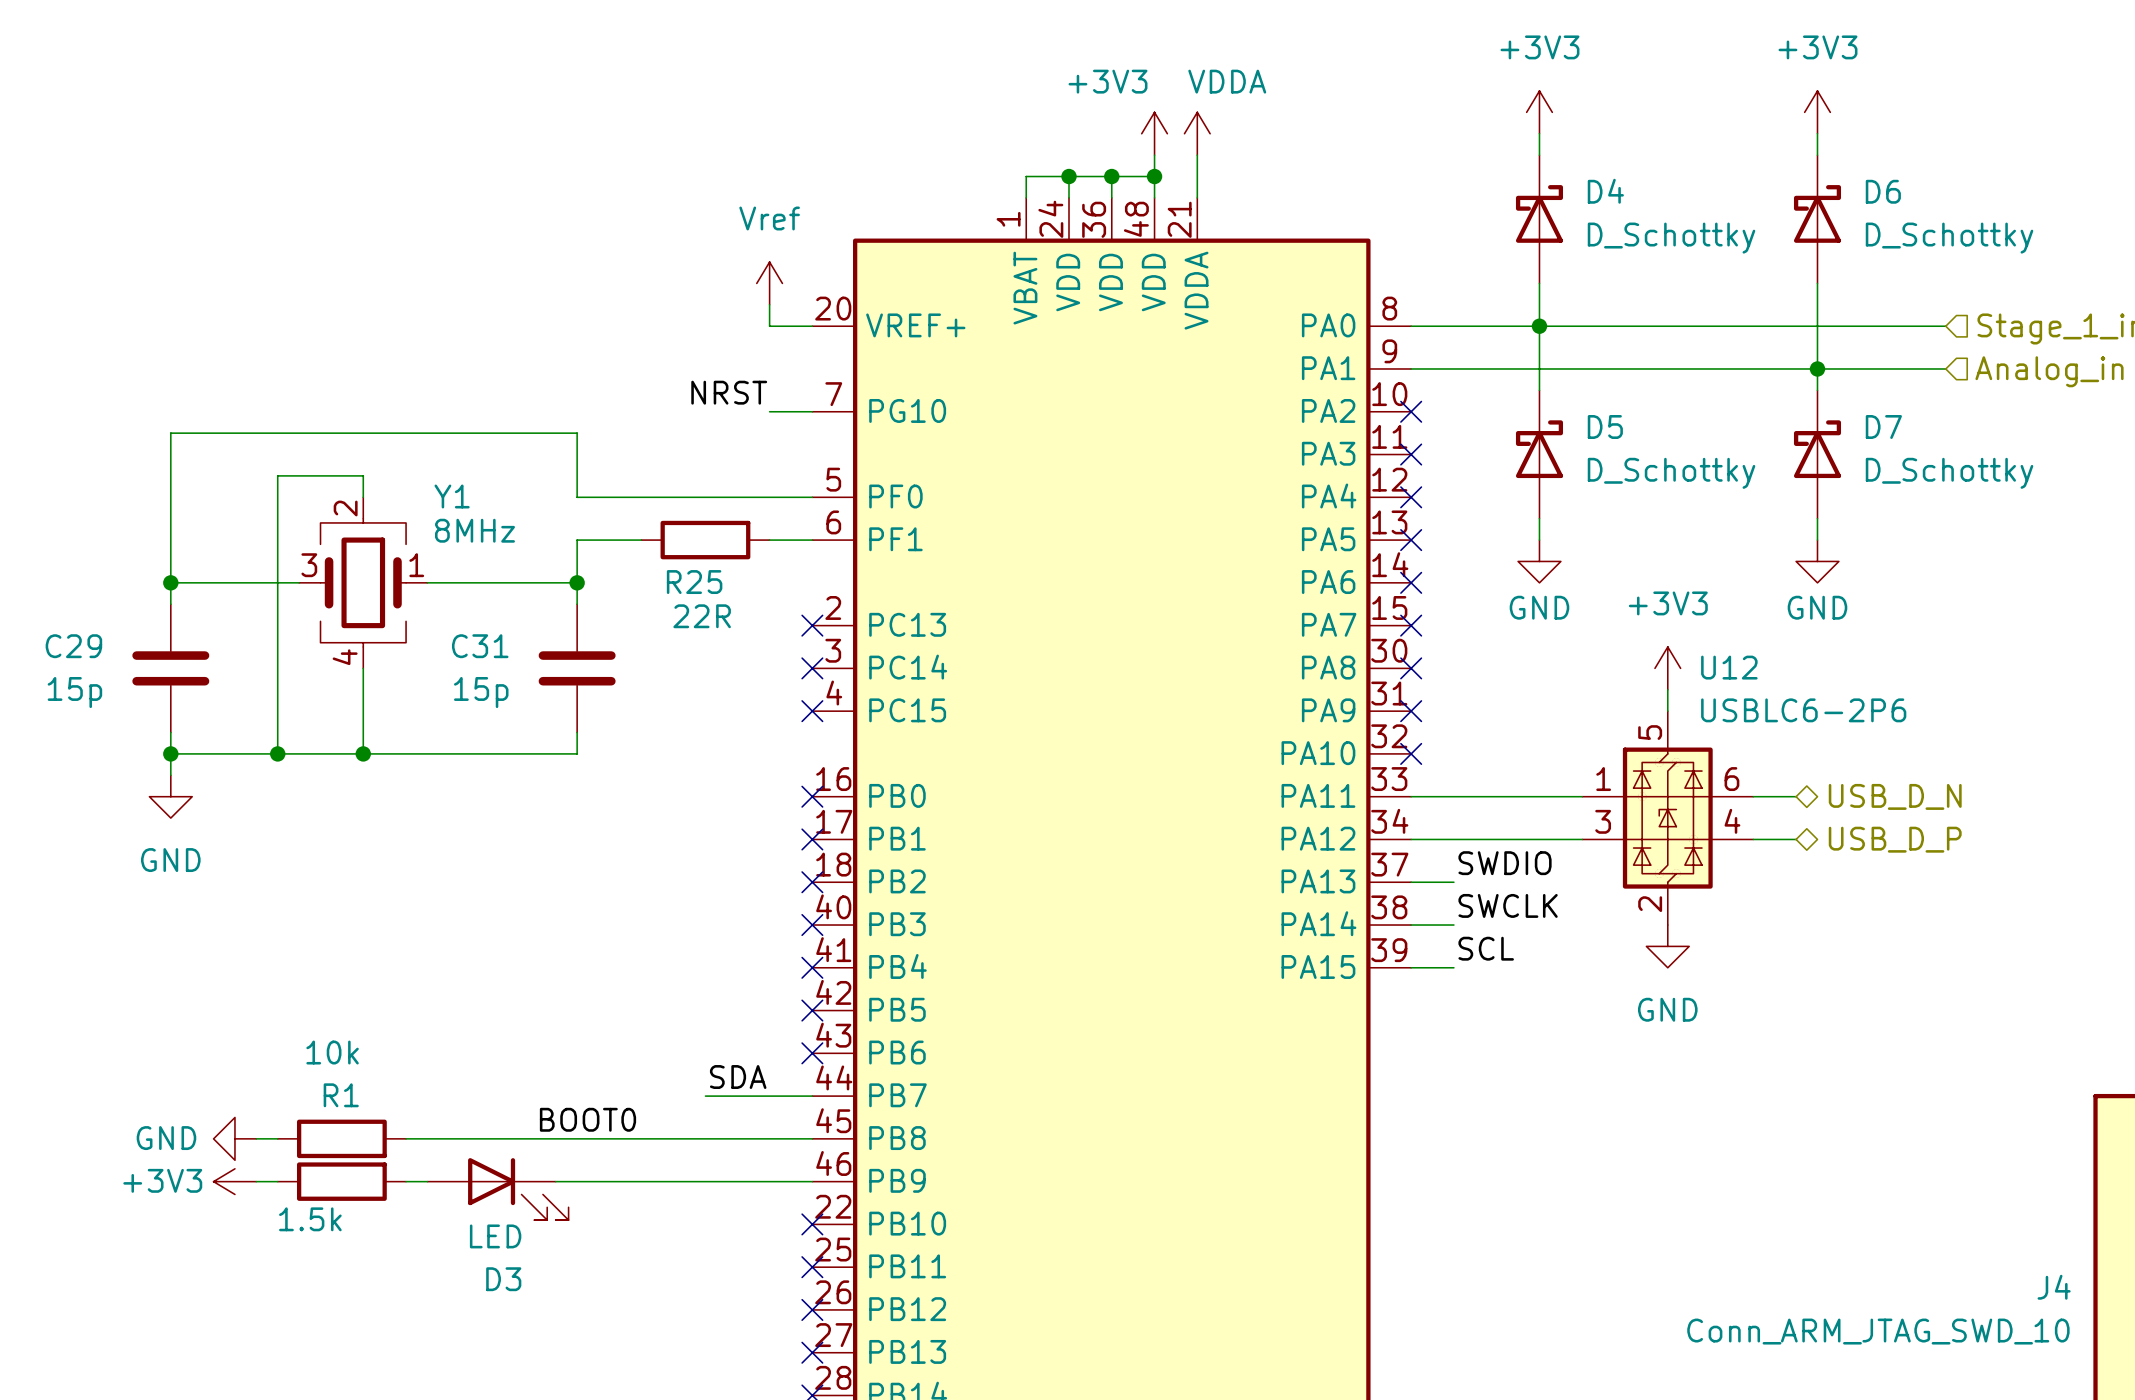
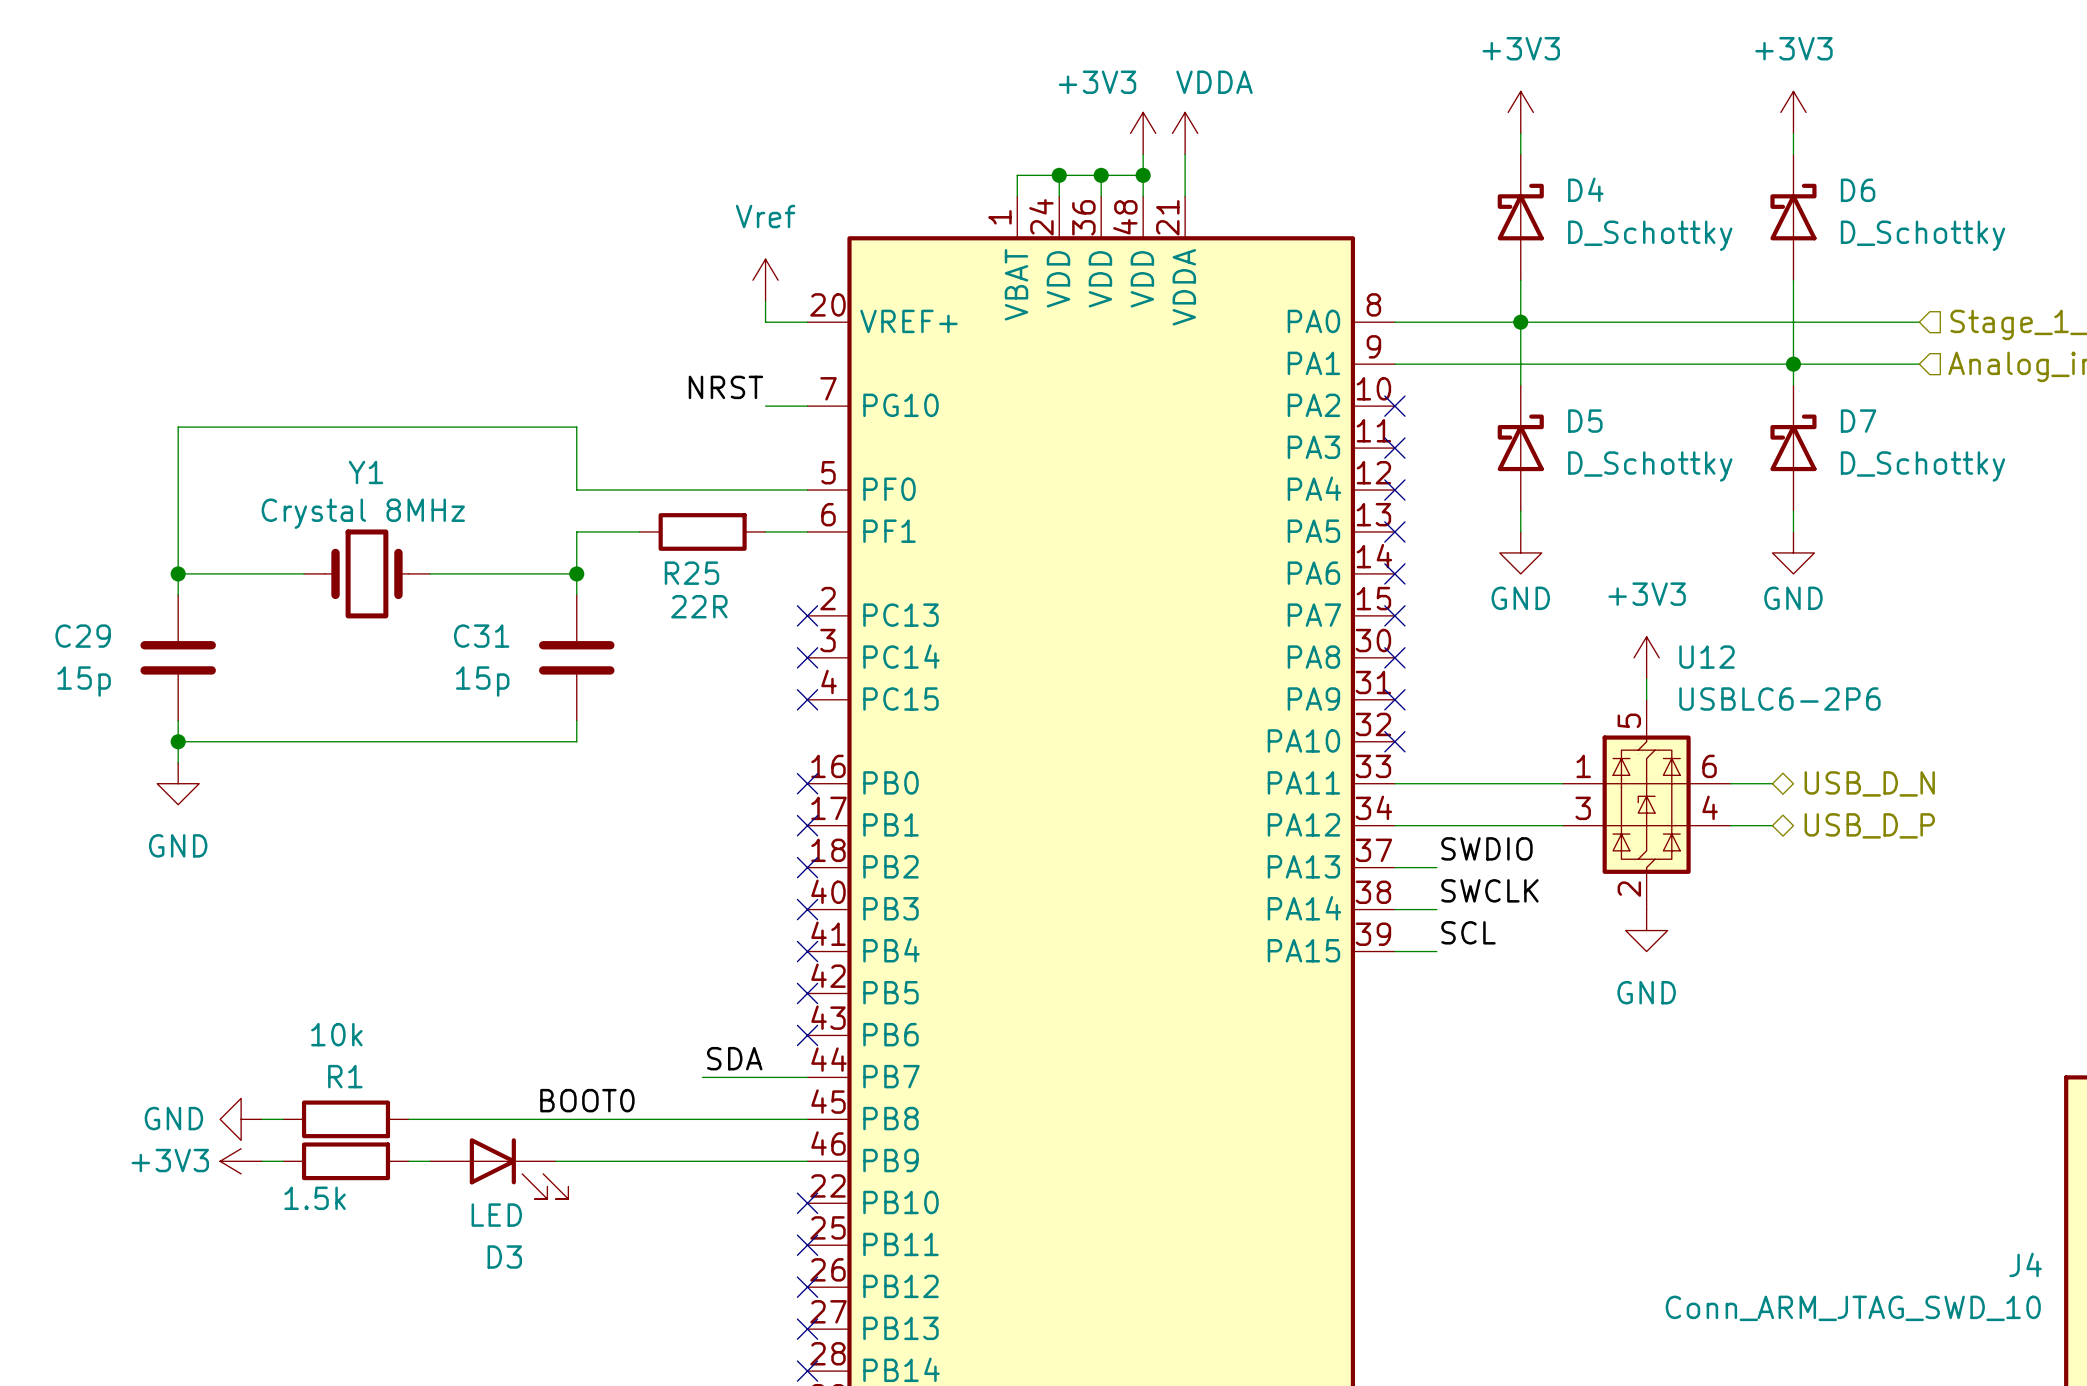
Y1 name position: Y1 (452, 496) -> Y1 (365, 472)
Y1 symbol: [299, 497, 428, 669] -> [304, 529, 430, 619]
wire: (363, 497) (363, 475) (277, 475) (277, 753) -> none
Y1 value: 8MHz (474, 530) -> Crystal 8MHz (363, 513)
wire: (363, 668) (363, 753) -> none
junction: (277, 753) -> none
junction: (363, 753) -> none

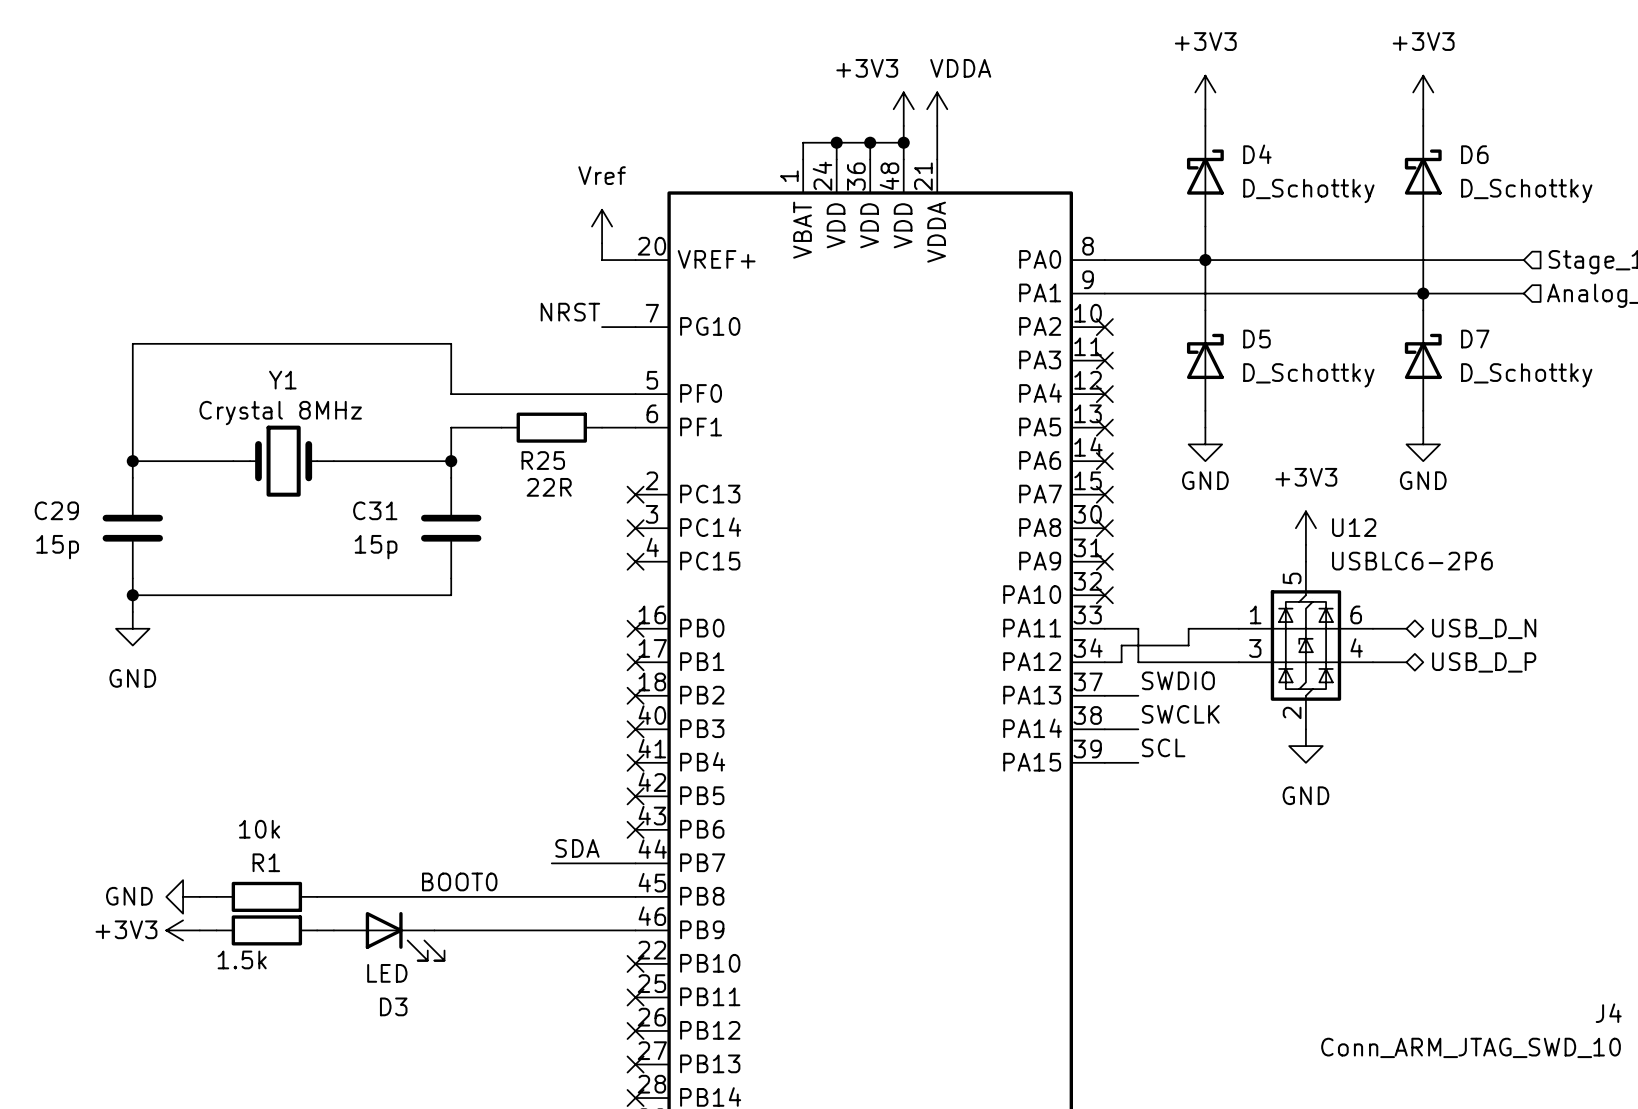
wire: (1436, 783) (1499, 783) -> (1121, 662) (1121, 645) (1188, 645) (1188, 628)
wire: (1415, 825) (1436, 825) -> (1138, 628) (1138, 662)

